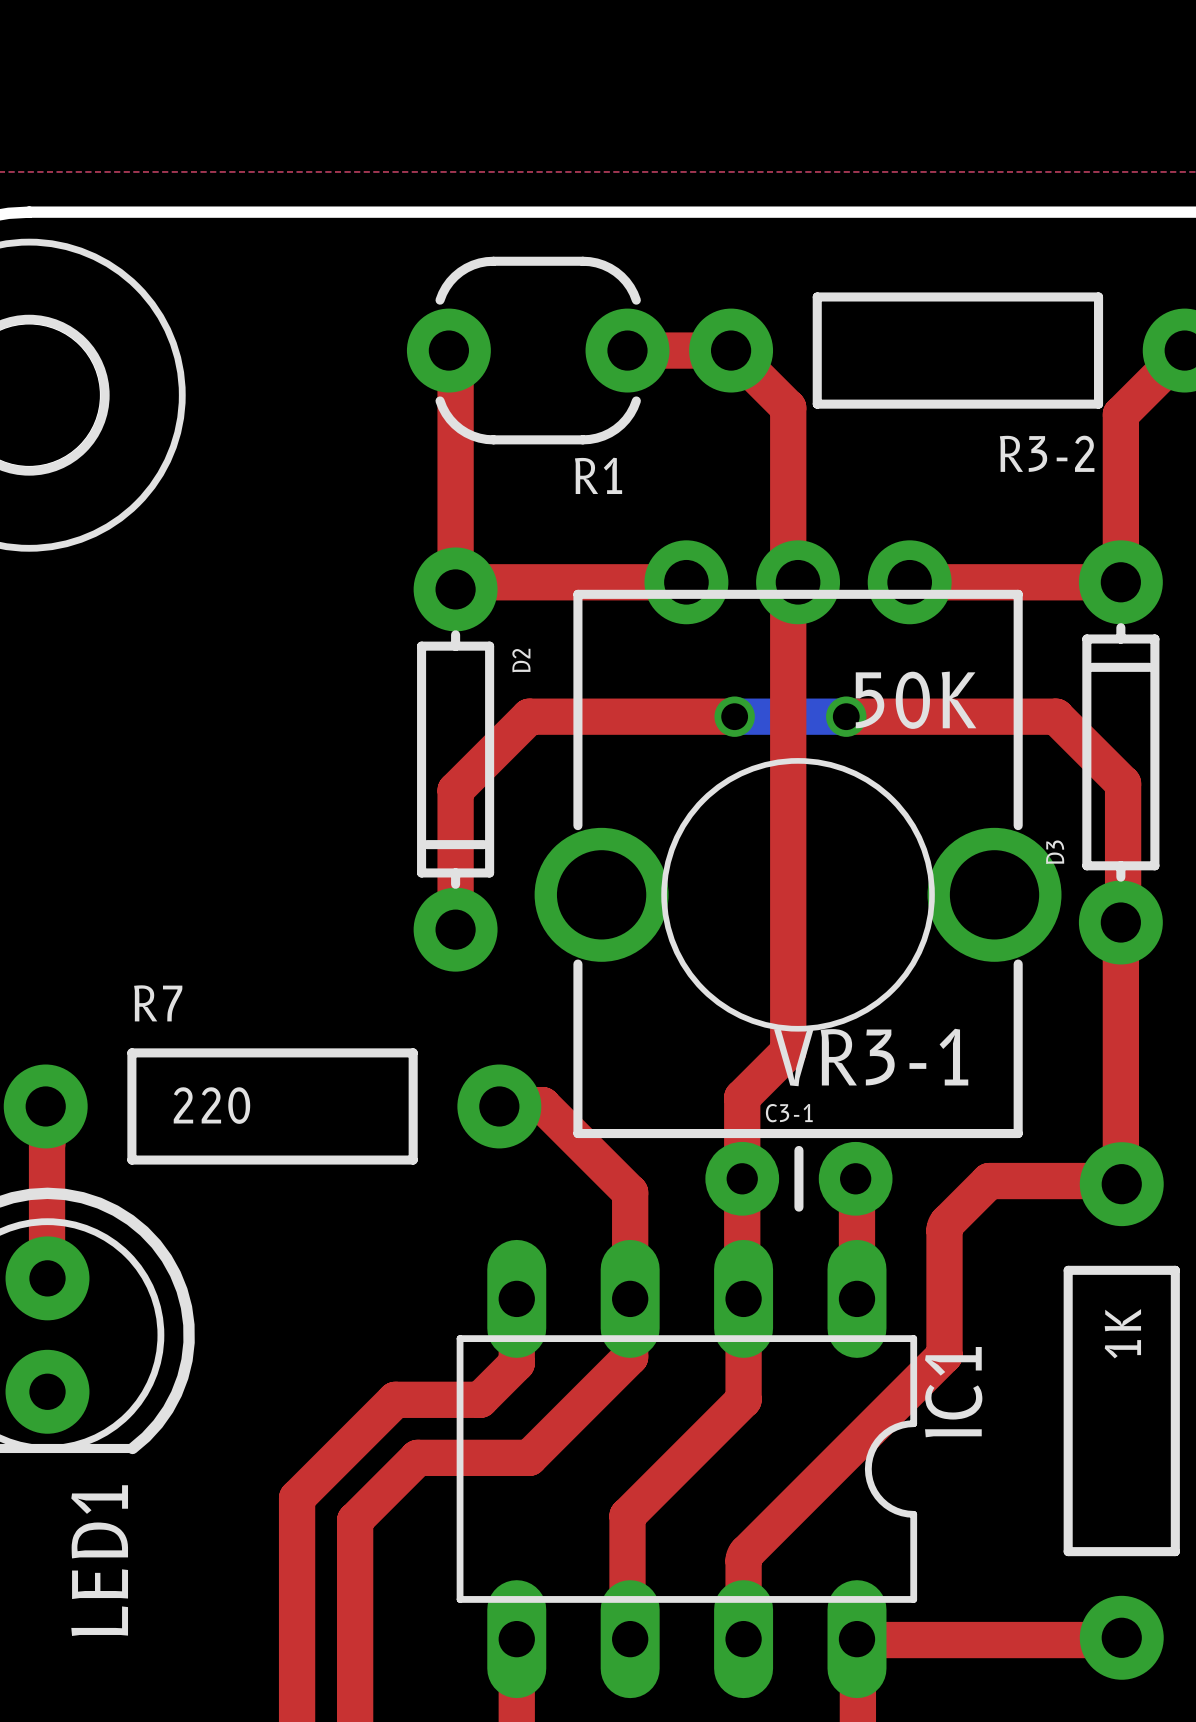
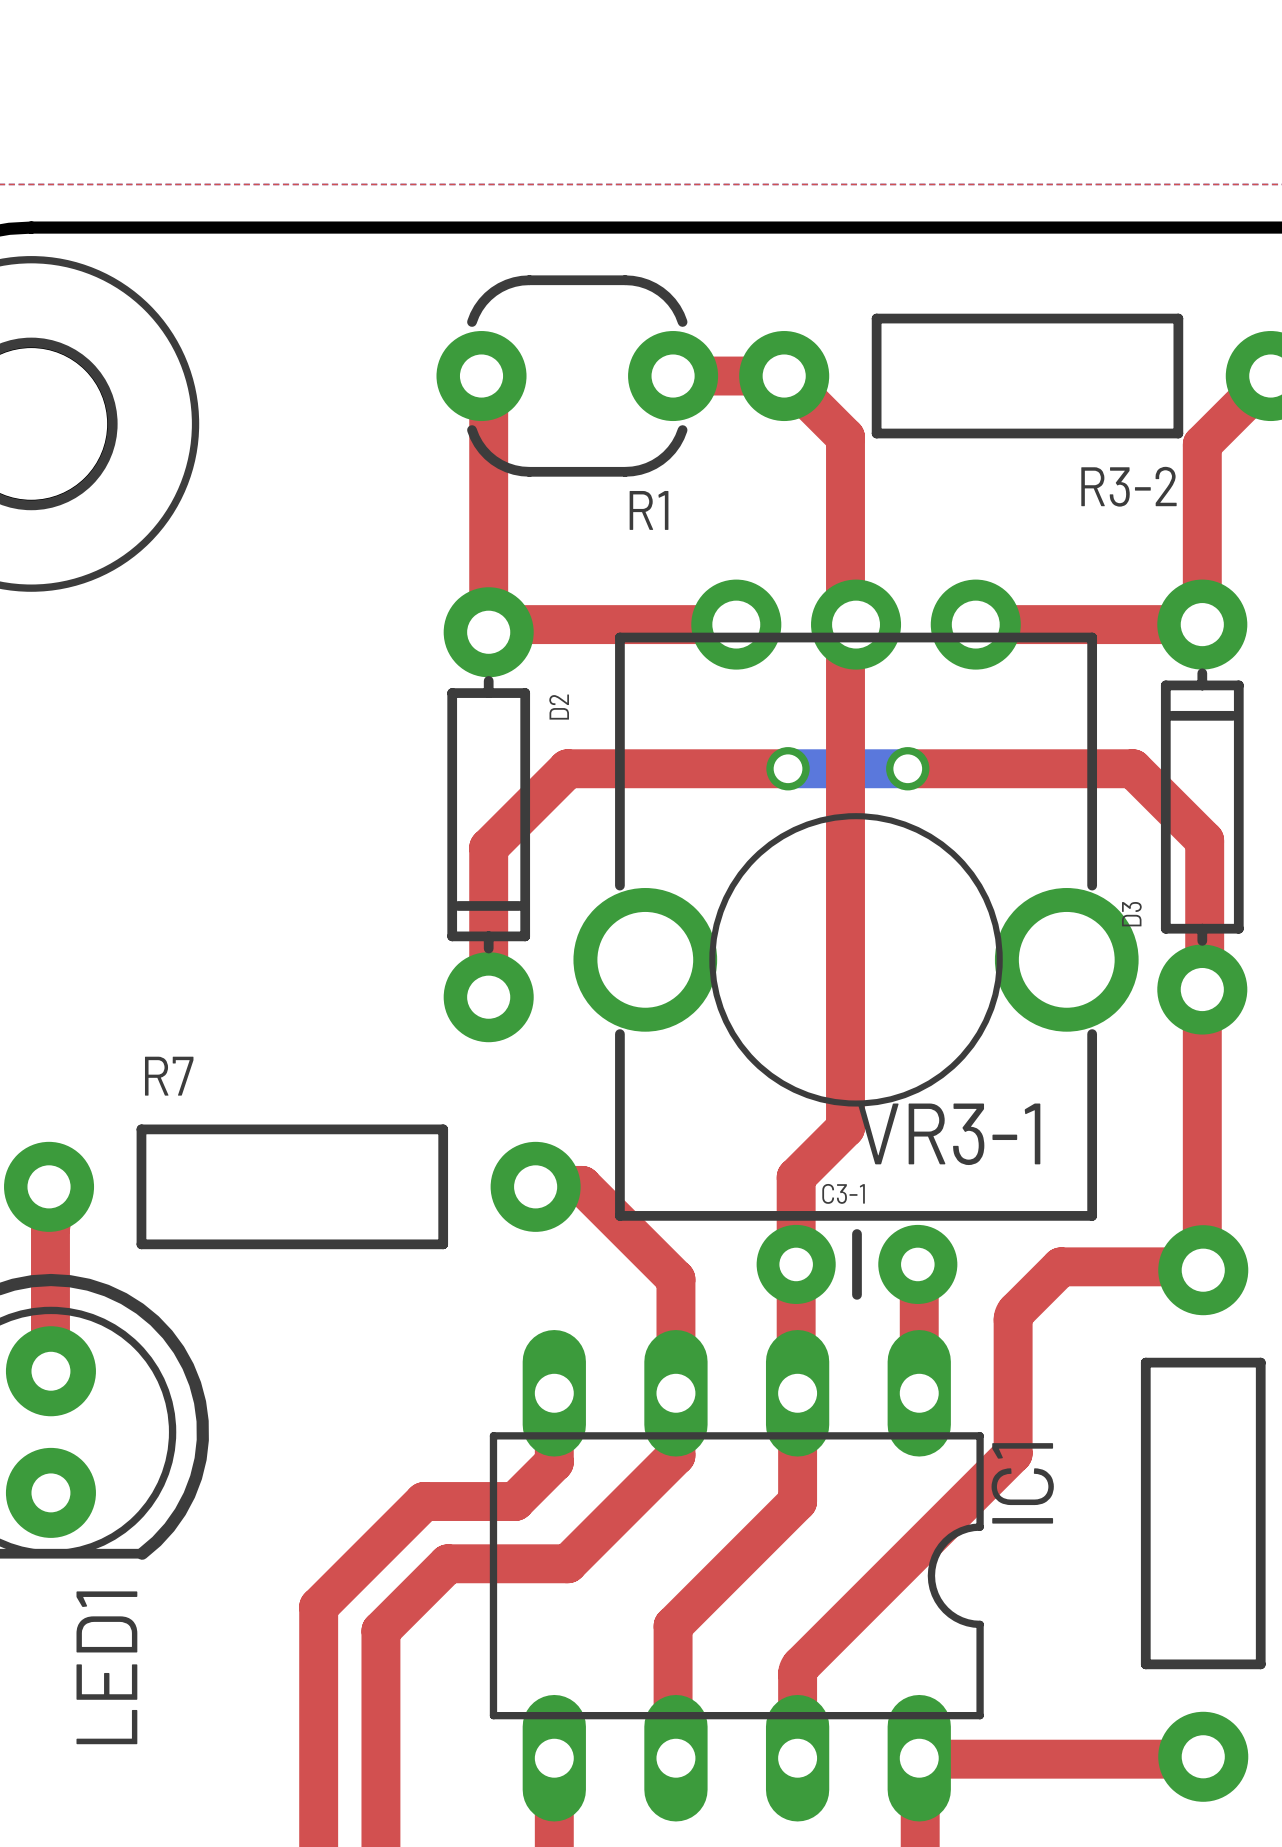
VR3-1 value: 50K (916, 700) -> none
R7 value: 220 (211, 1105) -> none
part value: 1K (1122, 1333) -> none

